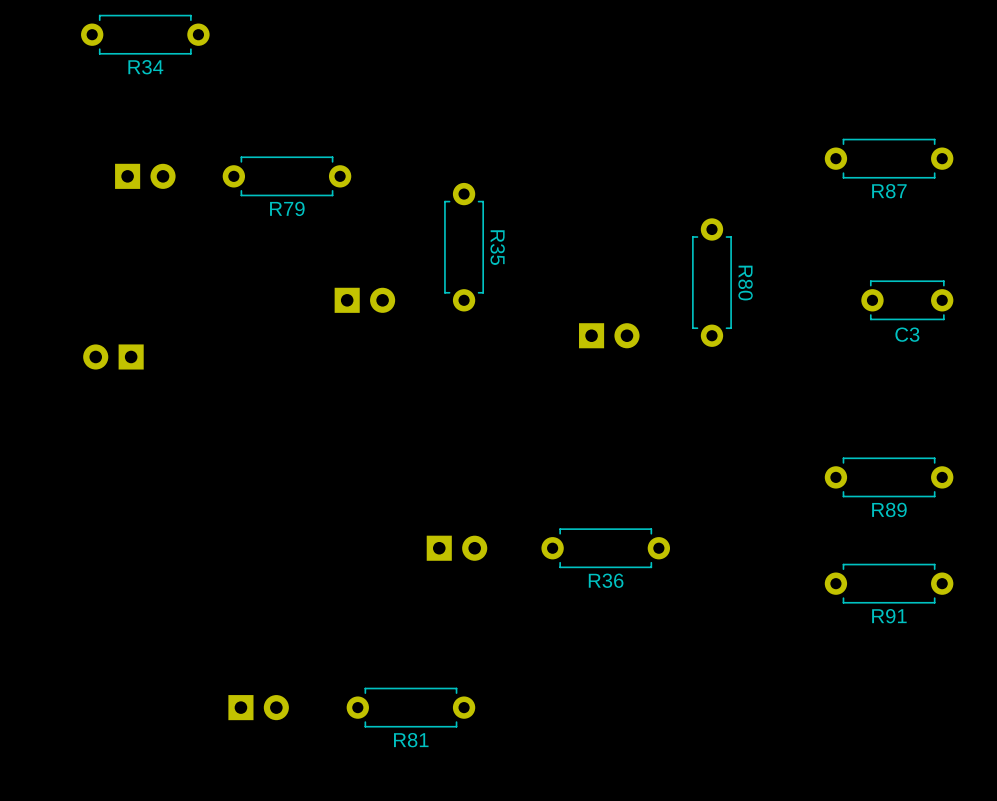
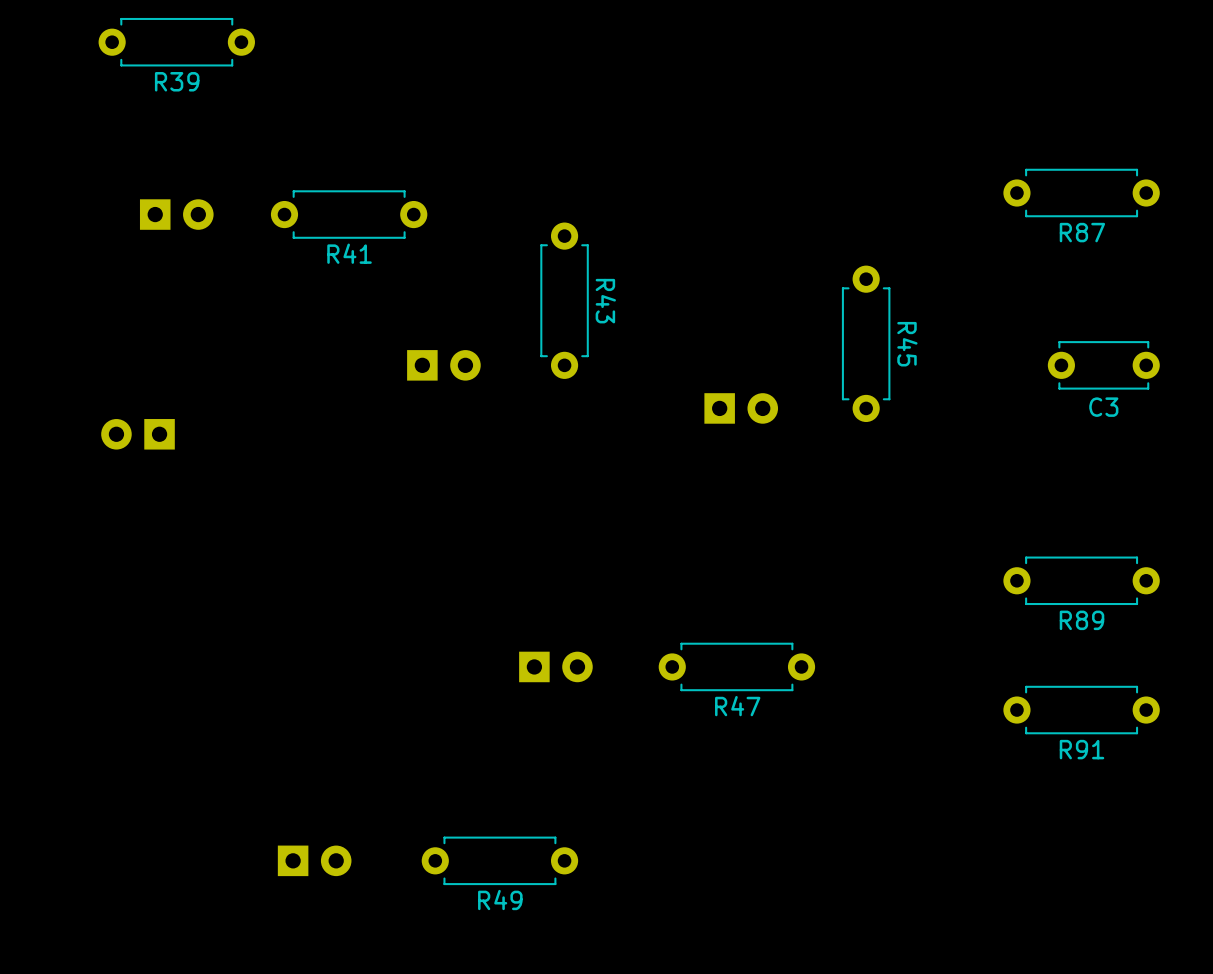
R34 name: R34 (145, 67) -> R39 (177, 81)
R79 name: R79 (287, 208) -> R41 (349, 253)
R35 name: R35 (497, 247) -> R43 (605, 301)
R80 name: R80 (745, 283) -> R45 (907, 344)
R36 name: R36 (606, 580) -> R47 (737, 706)
R81 name: R81 (411, 740) -> R49 (500, 900)

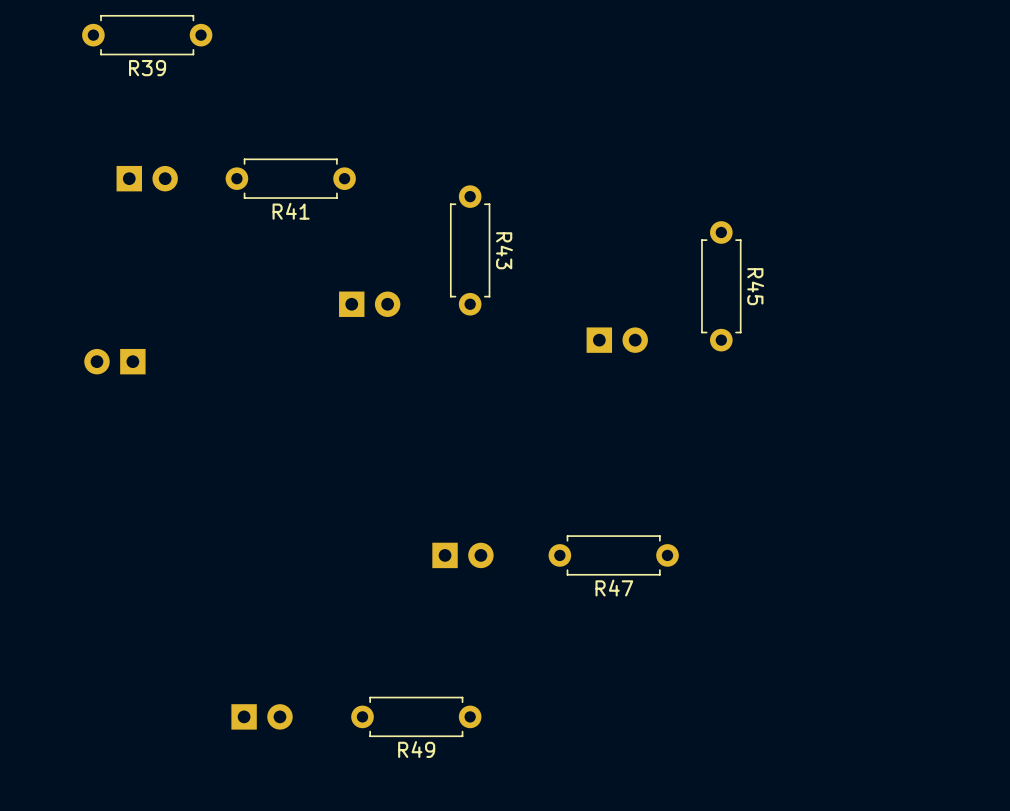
R87: (1081, 193) -> none
C3: (1103, 365) -> none
R89: (1081, 580) -> none
R91: (1081, 710) -> none

